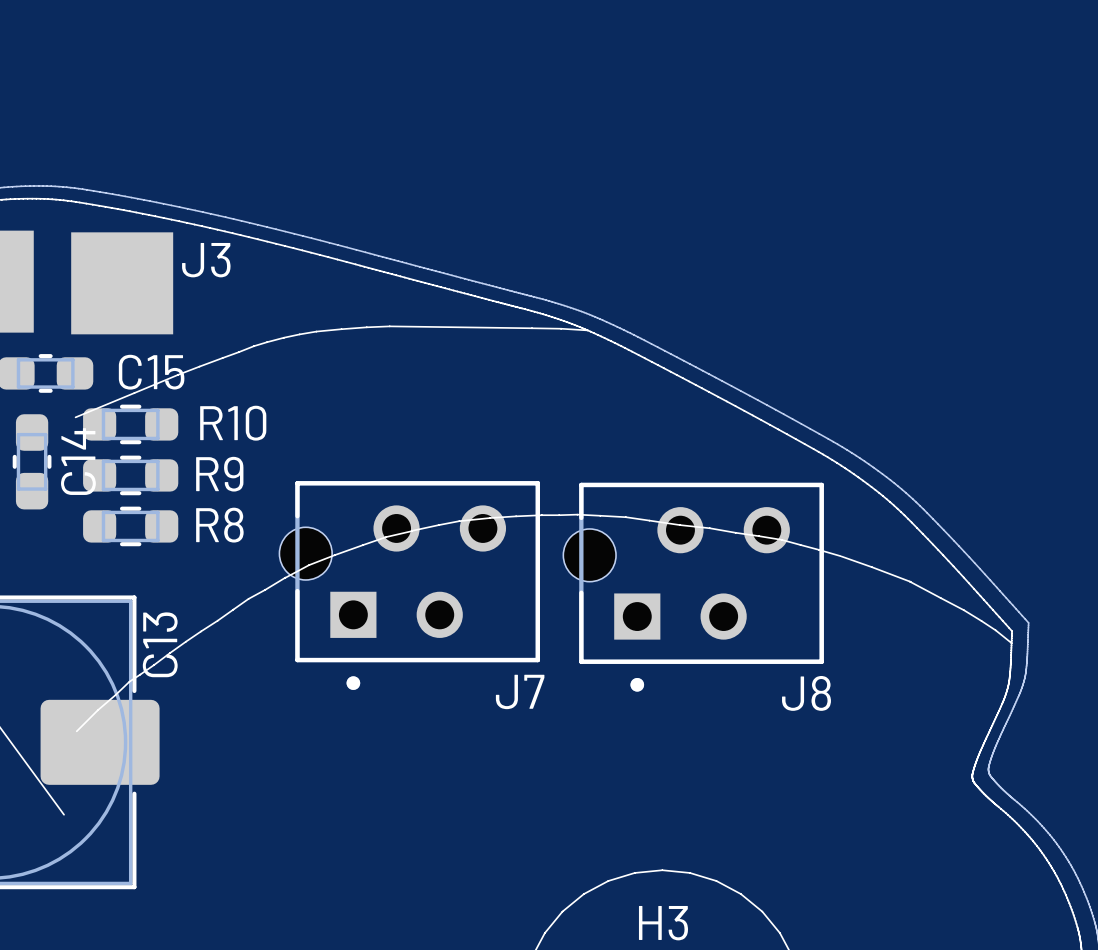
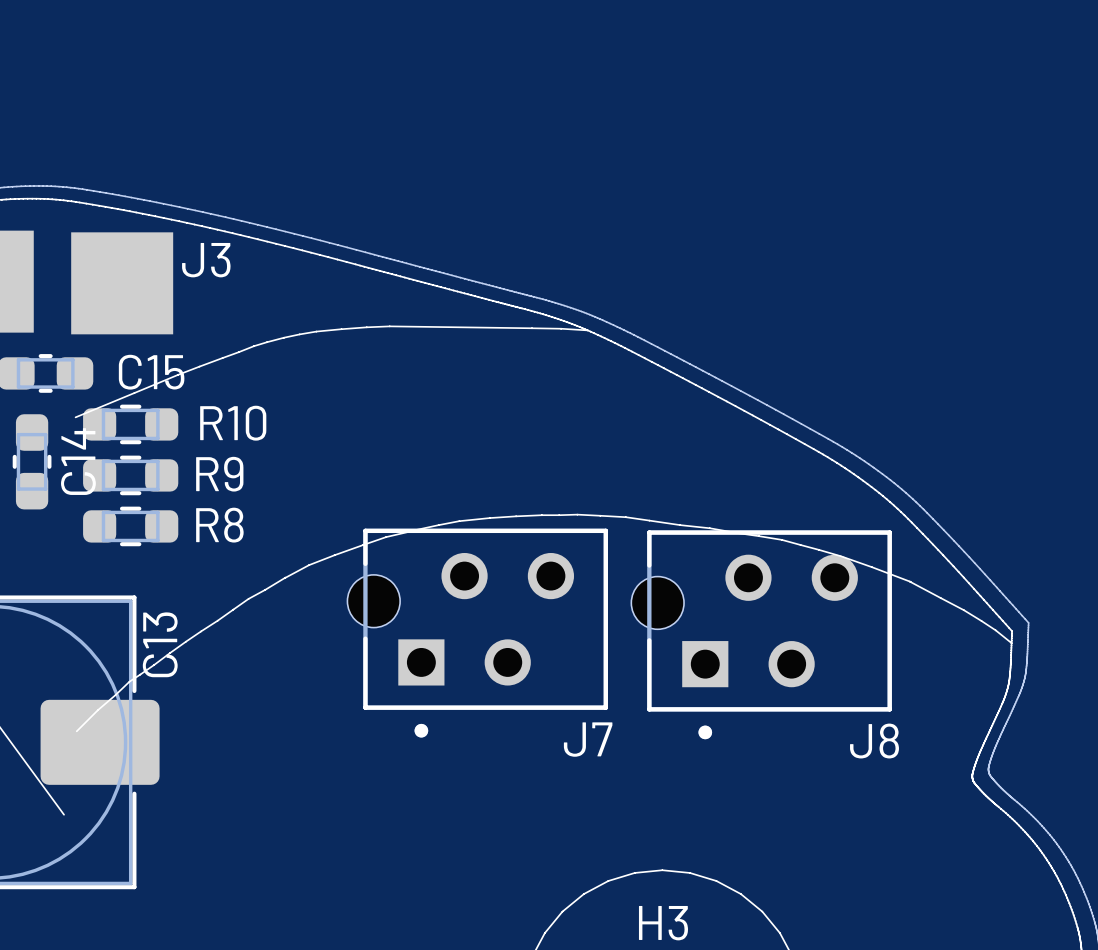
J7 position: (409, 585) -> (477, 633)
J8 position: (693, 587) -> (761, 634)

